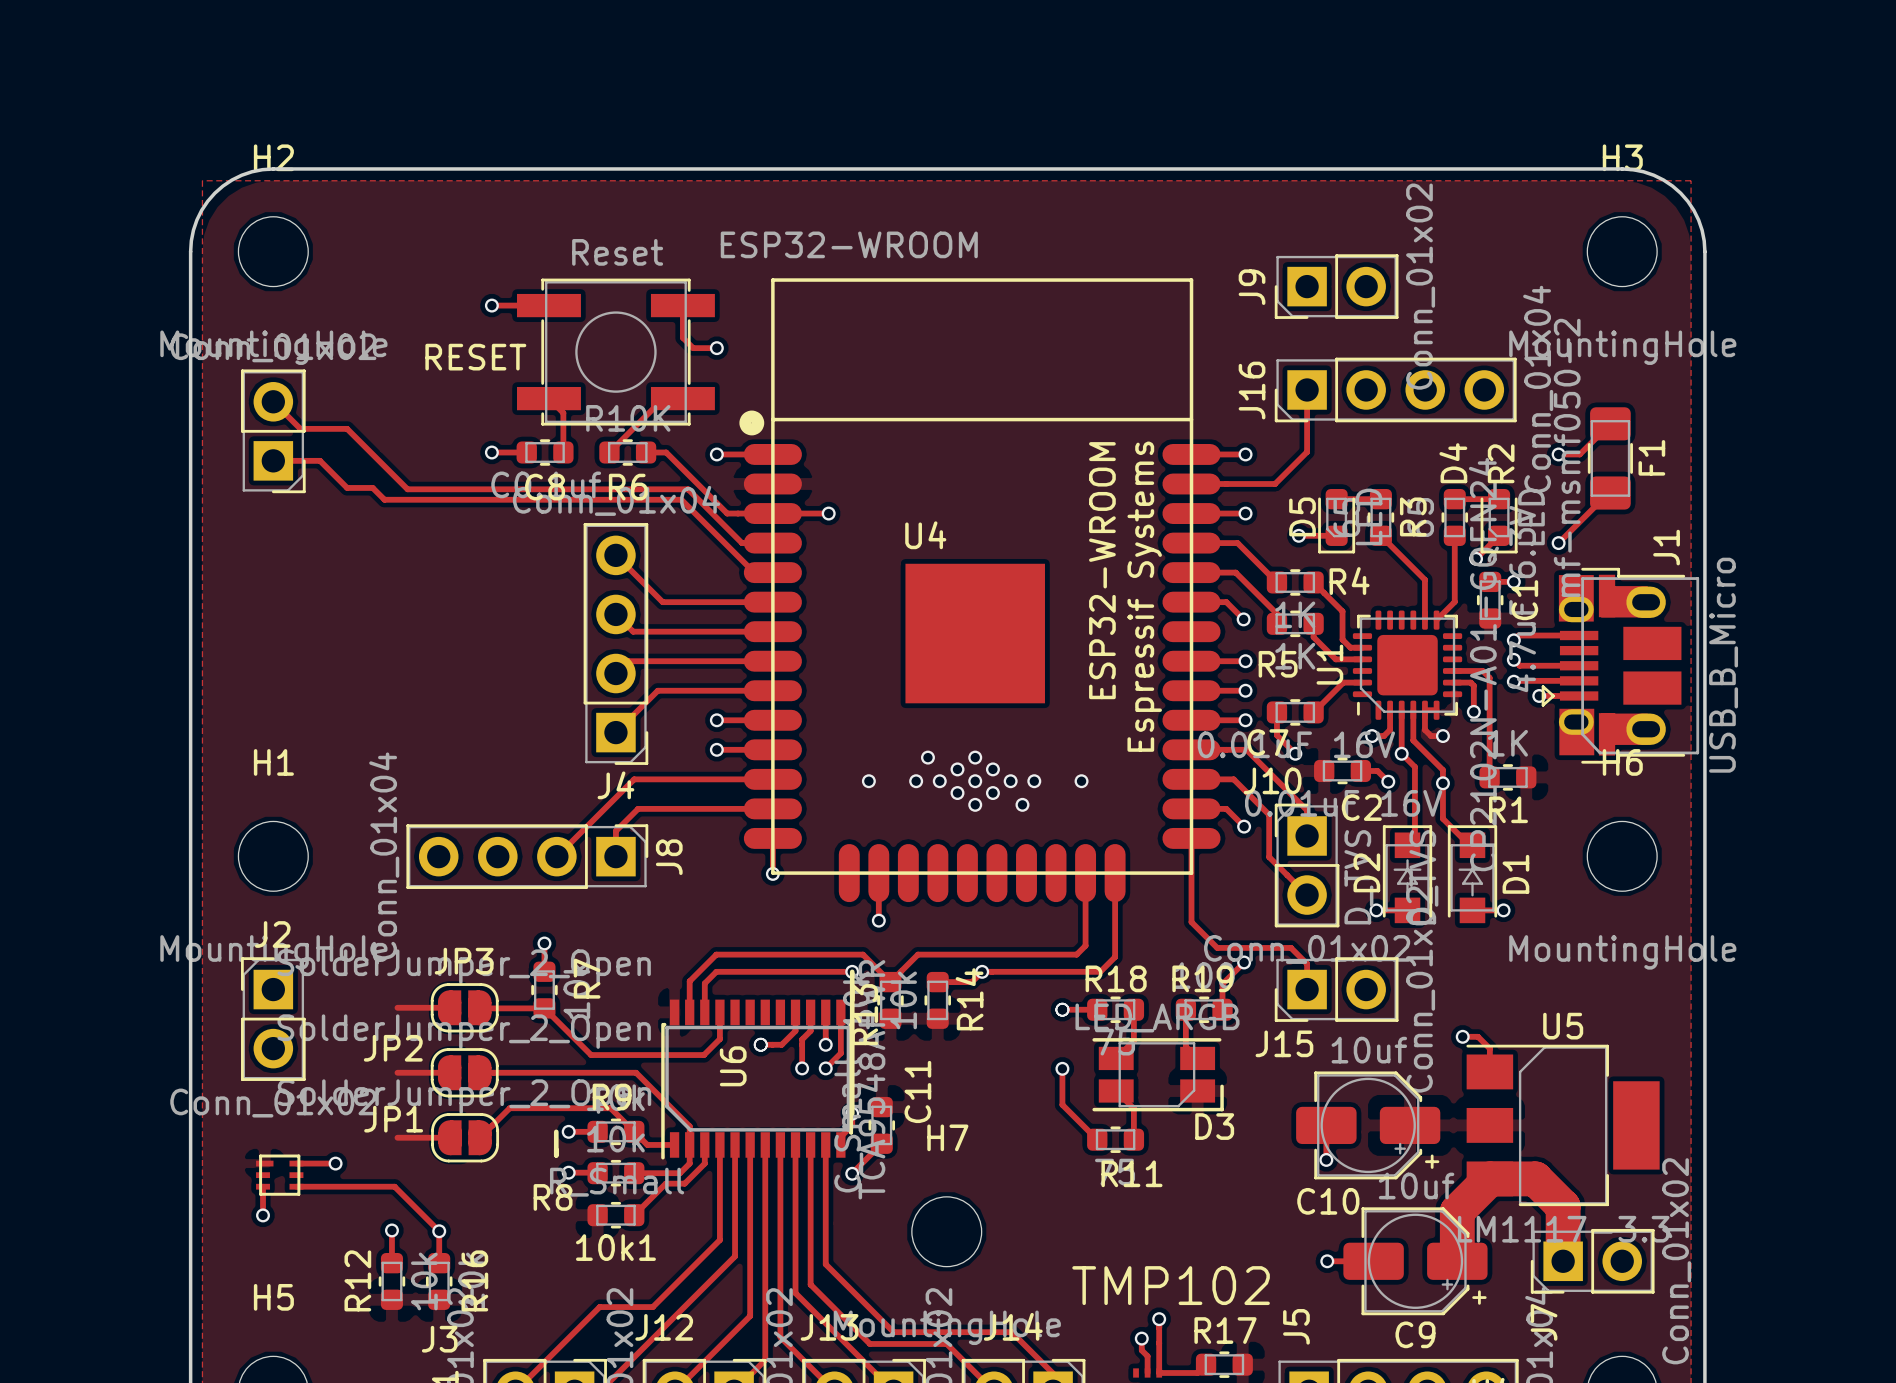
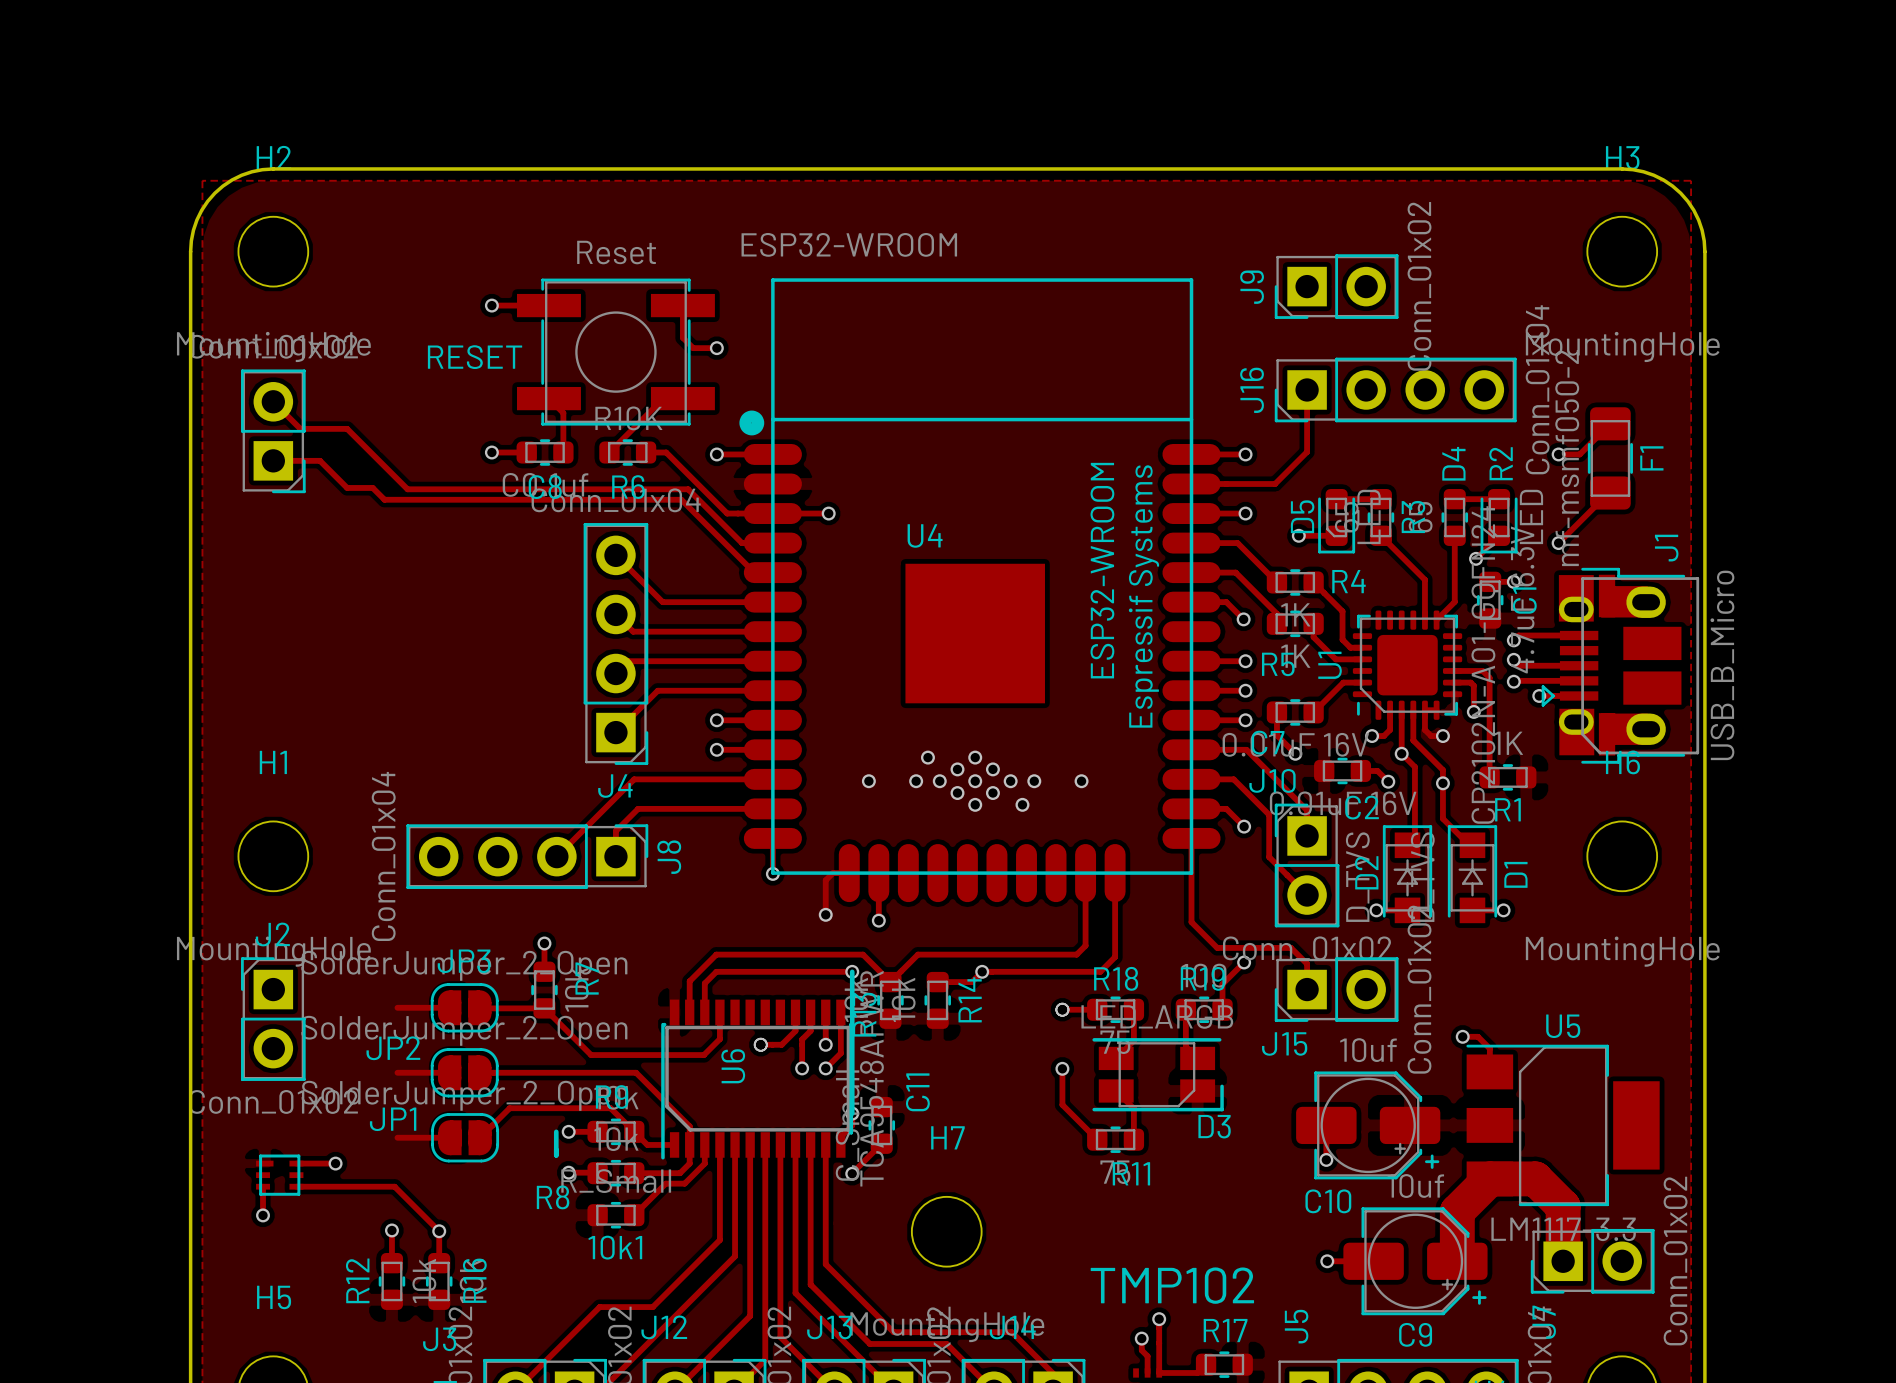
track: none -> (849, 873) (833, 873) (825, 880) (825, 914)
via: none -> (825, 914)

